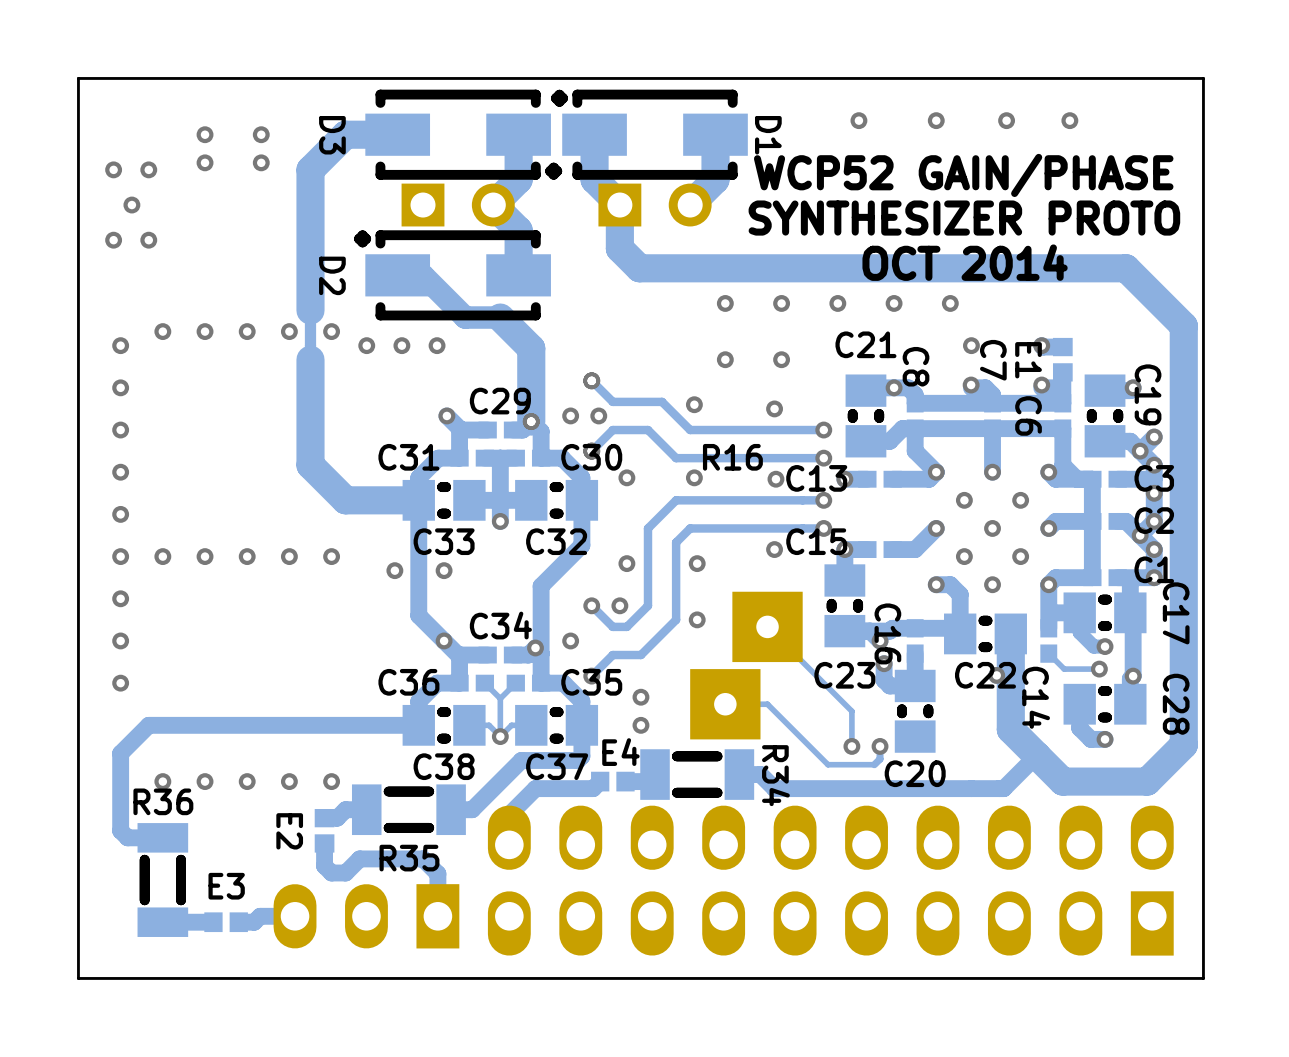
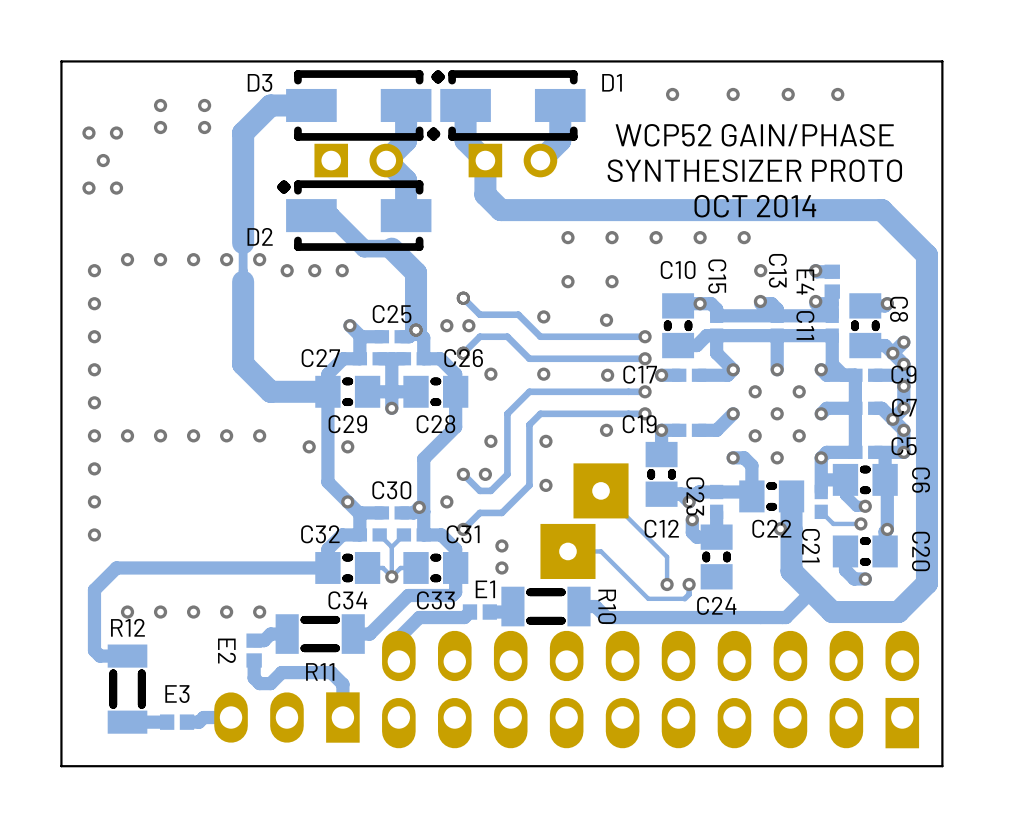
D3 name rotation: 0° (332, 135) -> 90° counterclockwise (260, 82)
D1 name rotation: 0° (768, 135) -> 90° counterclockwise (612, 82)
D2 name rotation: 0° (332, 275) -> 90° counterclockwise (260, 236)
C21 name: C21 (865, 344) -> C10 (678, 270)
C7 name: C7 (993, 360) -> C13 (777, 270)
E1 name: E1 (1028, 360) -> E4 (805, 282)
C8 name: C8 (916, 366) -> C15 (717, 276)
C19 name: C19 (1148, 394) -> C8 (899, 309)
C29 name: C29 (500, 401) -> C25 (392, 314)
C6 name: C6 (1028, 415) -> C11 (805, 325)
C31 name: C31 (408, 457) -> C27 (320, 358)
C30 name: C30 (591, 457) -> C26 (463, 358)
R16: (732, 457) -> none
C13 name: C13 (816, 478) -> C17 (640, 374)
C3 name: C3 (1154, 478) -> C9 (903, 374)
C2 name: C2 (1154, 520) -> C7 (904, 407)
C33 name: C33 (444, 541) -> C29 (347, 424)
C32 name: C32 (556, 541) -> C28 (435, 424)
C15 name: C15 (816, 541) -> C19 (639, 424)
C1 name: C1 (1154, 569) -> C5 (904, 446)
C17 name: C17 (1176, 613) -> C6 (921, 480)
C34 name: C34 (500, 625) -> C30 (391, 490)
C16 name: C16 (887, 633) -> C23 (695, 496)
C23 name: C23 (844, 675) -> C12 (661, 528)
C36 name: C36 (408, 682) -> C32 (320, 534)
C35 name: C35 (591, 682) -> C31 (463, 534)
C14 name: C14 (1036, 697) -> C21 (810, 545)
C28 name: C28 (1176, 704) -> C20 (921, 551)
E4 name: E4 (620, 752) -> E1 (485, 589)
C38 name: C38 (444, 766) -> C34 (347, 600)
C37 name: C37 (557, 766) -> C33 (435, 600)
C20 name: C20 (915, 773) -> C24 (716, 605)
R34 name: R34 (775, 775) -> R10 (607, 606)
R36 name: R36 (163, 801) -> R12 (127, 627)
R35 name: R35 (409, 858) -> R11 (320, 671)

